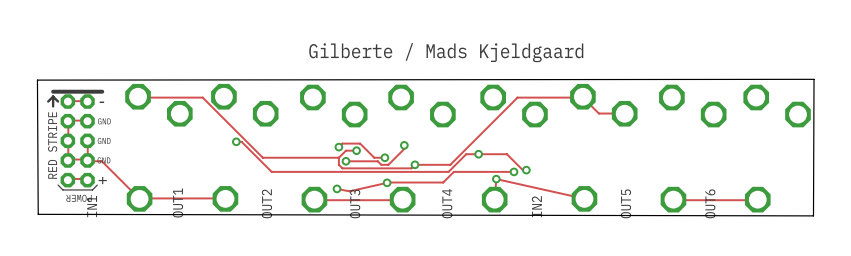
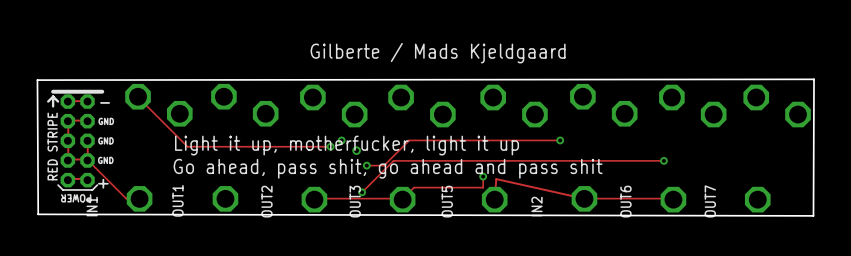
track: (138, 96) (202, 97) (262, 157) (338, 157) -> (138, 96) (187, 146) (330, 146)
track: (624, 113) (598, 113) (582, 96) (517, 97) (450, 164) (414, 164) (411, 168) (342, 168) (338, 164) (338, 157) -> none
via: none -> (341, 140)
track: none -> (560, 140) (409, 140) (384, 165) (366, 165)
via: none -> (560, 140)
track: (236, 141) (241, 141) (271, 171) (448, 171) (466, 154) (506, 154) (522, 170) (526, 170) -> none
via: (236, 141) -> none
text: none -> Light it up, motherfucker, light it up (347, 145)
track: (404, 145) (404, 148) (388, 164) (381, 164) (377, 161) (345, 161) -> none
via: (404, 145) -> none
via: none -> (330, 146)
track: (338, 147) (342, 143) (360, 143) (374, 157) (384, 157) -> none
via: (338, 147) -> none
track: (356, 150) (345, 150) (338, 157) -> none
via: (478, 154) -> none
via: (384, 157) -> none
track: none -> (86, 159) (126, 198) (139, 198)
track: (87, 160) (101, 161) (139, 198) (225, 198) -> none
track: none -> (663, 160) (393, 160) (362, 192)
via: none -> (663, 160)
via: (345, 161) -> none
via: (414, 164) -> none
via: none -> (366, 165)
text: none -> Go ahead, pass shit, go ahead and pass shit (388, 168)
via: (526, 170) -> none
track: (514, 171) (453, 171) (443, 182) (386, 182) (349, 191) (337, 188) -> none
via: (514, 171) -> none
via: none -> (483, 176)
via: (496, 179) -> none
via: (387, 182) -> none
via: (337, 188) -> none
via: none -> (362, 192)
track: (314, 199) (402, 199) -> (314, 199) (402, 199) (413, 187) (483, 187) (483, 176)
track: (673, 199) (757, 199) -> (673, 199) (584, 198)
OUT4 name: OUT4 (447, 203) -> OUT5 (447, 201)
OUT5 name: OUT5 (625, 203) -> OUT6 (625, 201)
OUT6 name: OUT6 (710, 203) -> OUT7 (710, 201)

